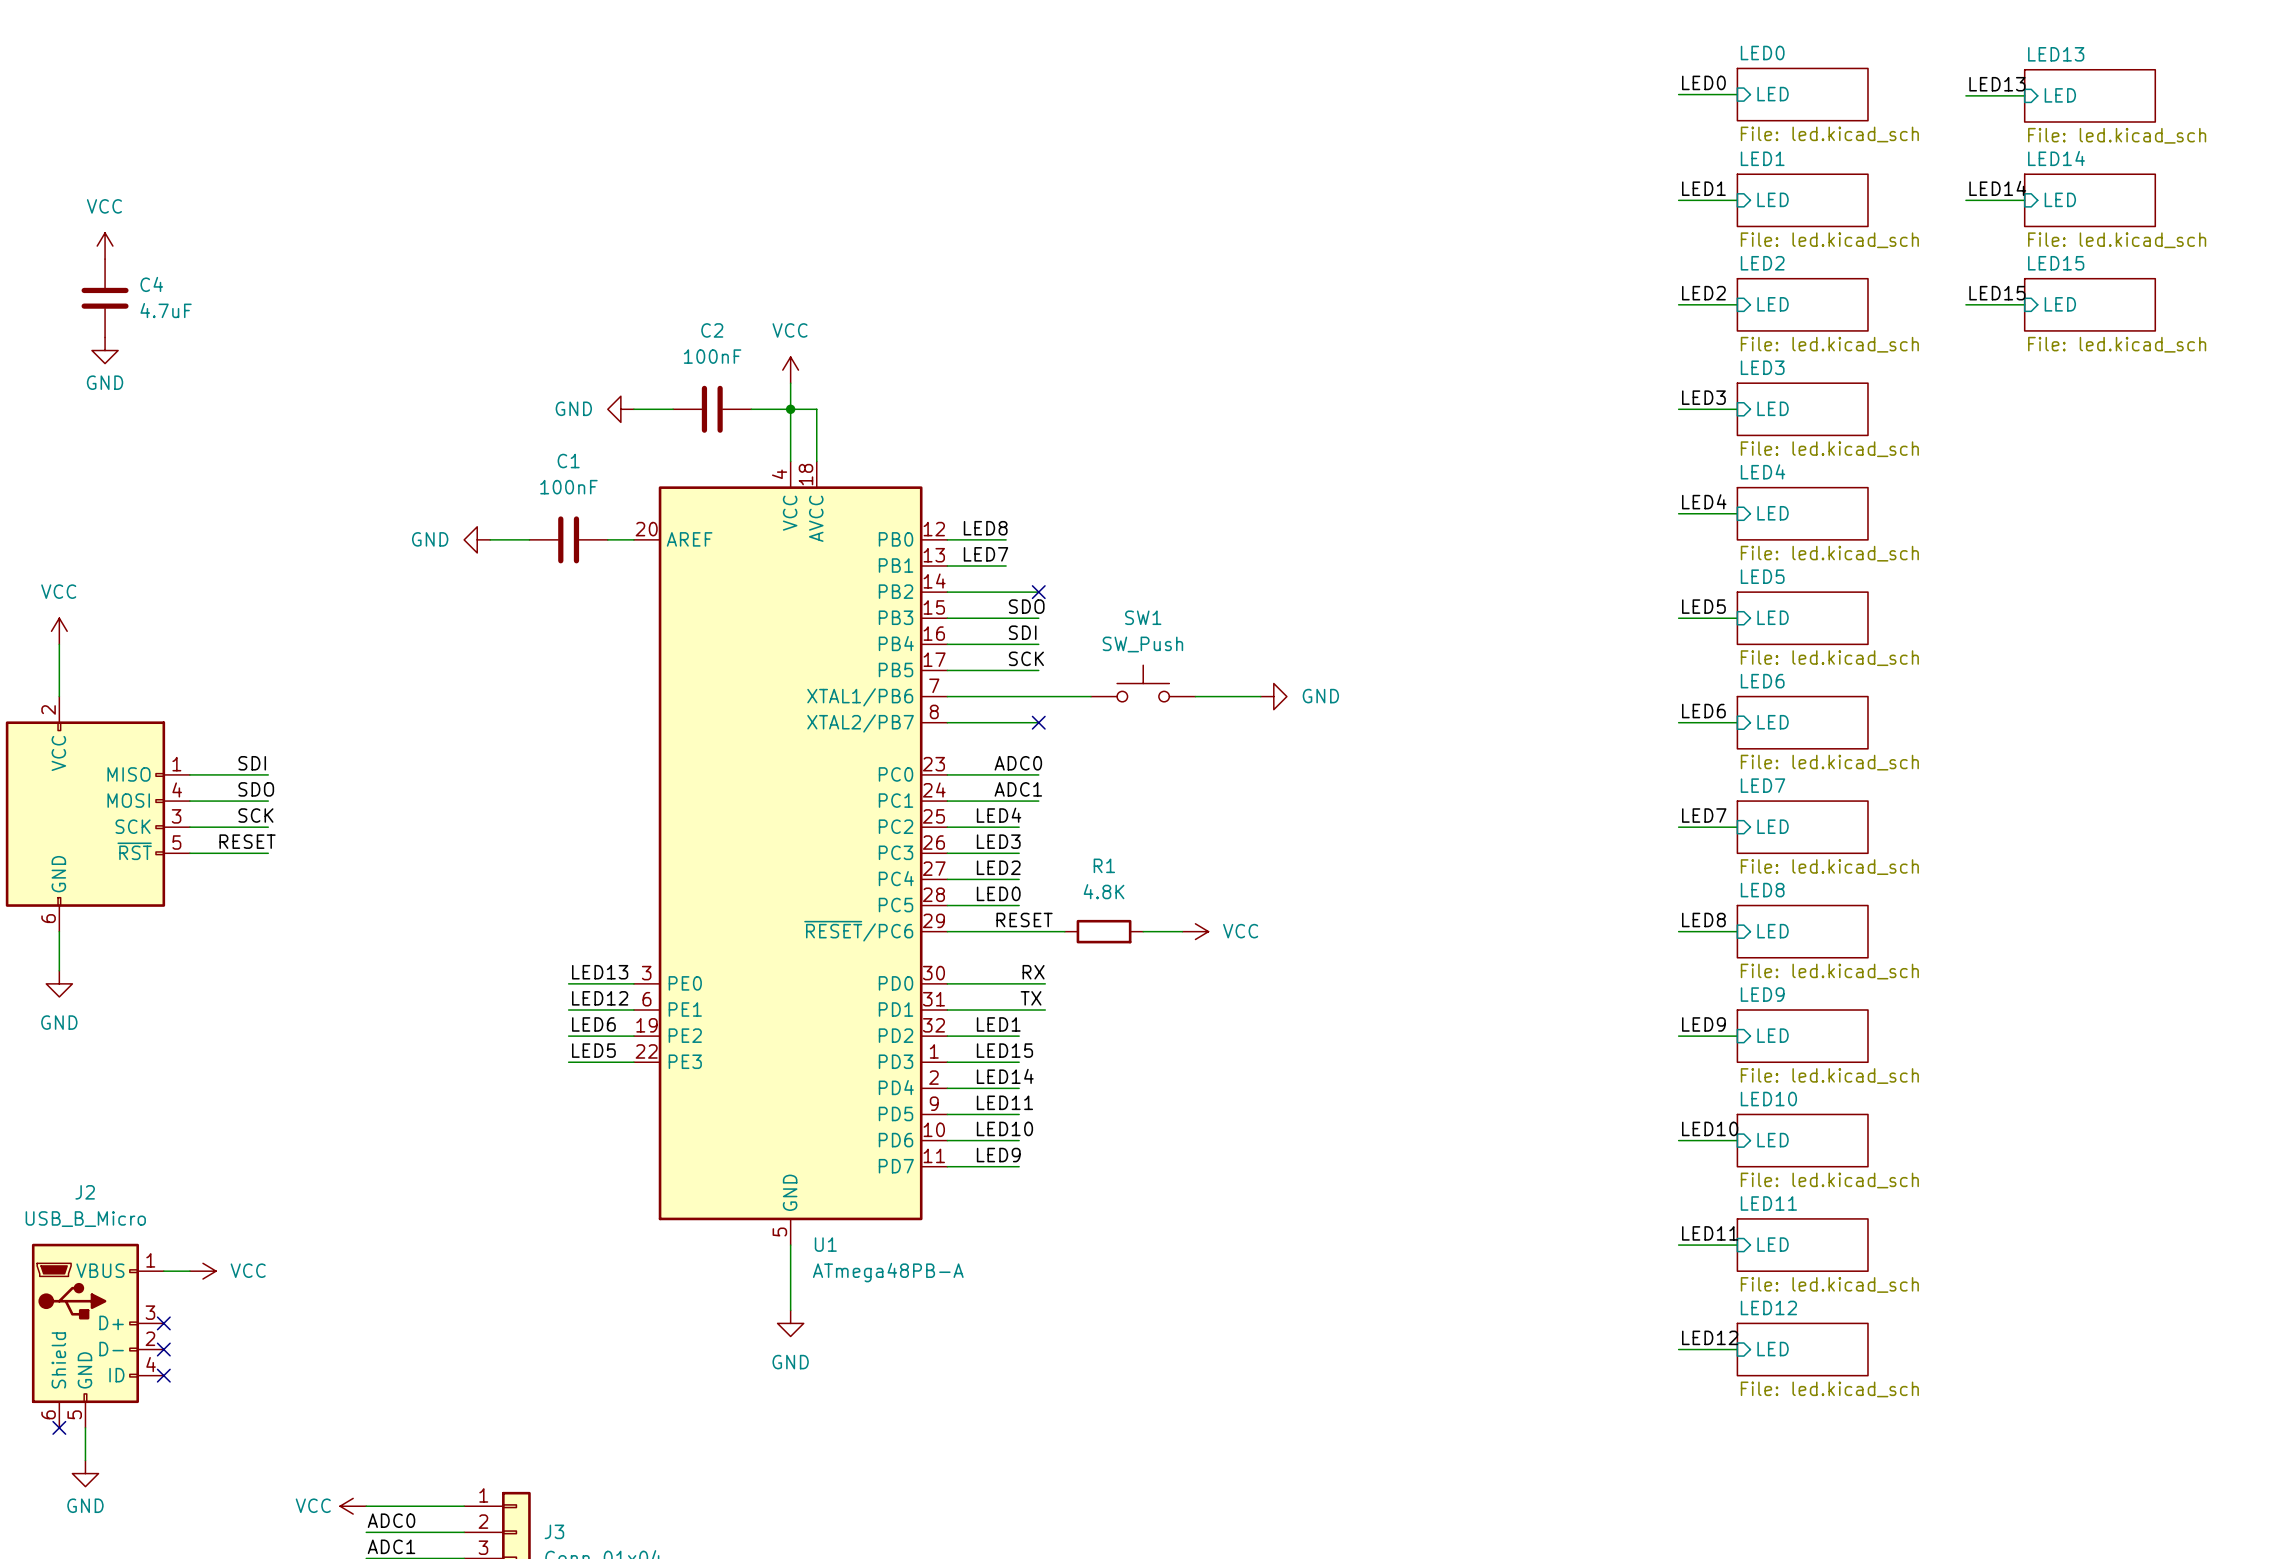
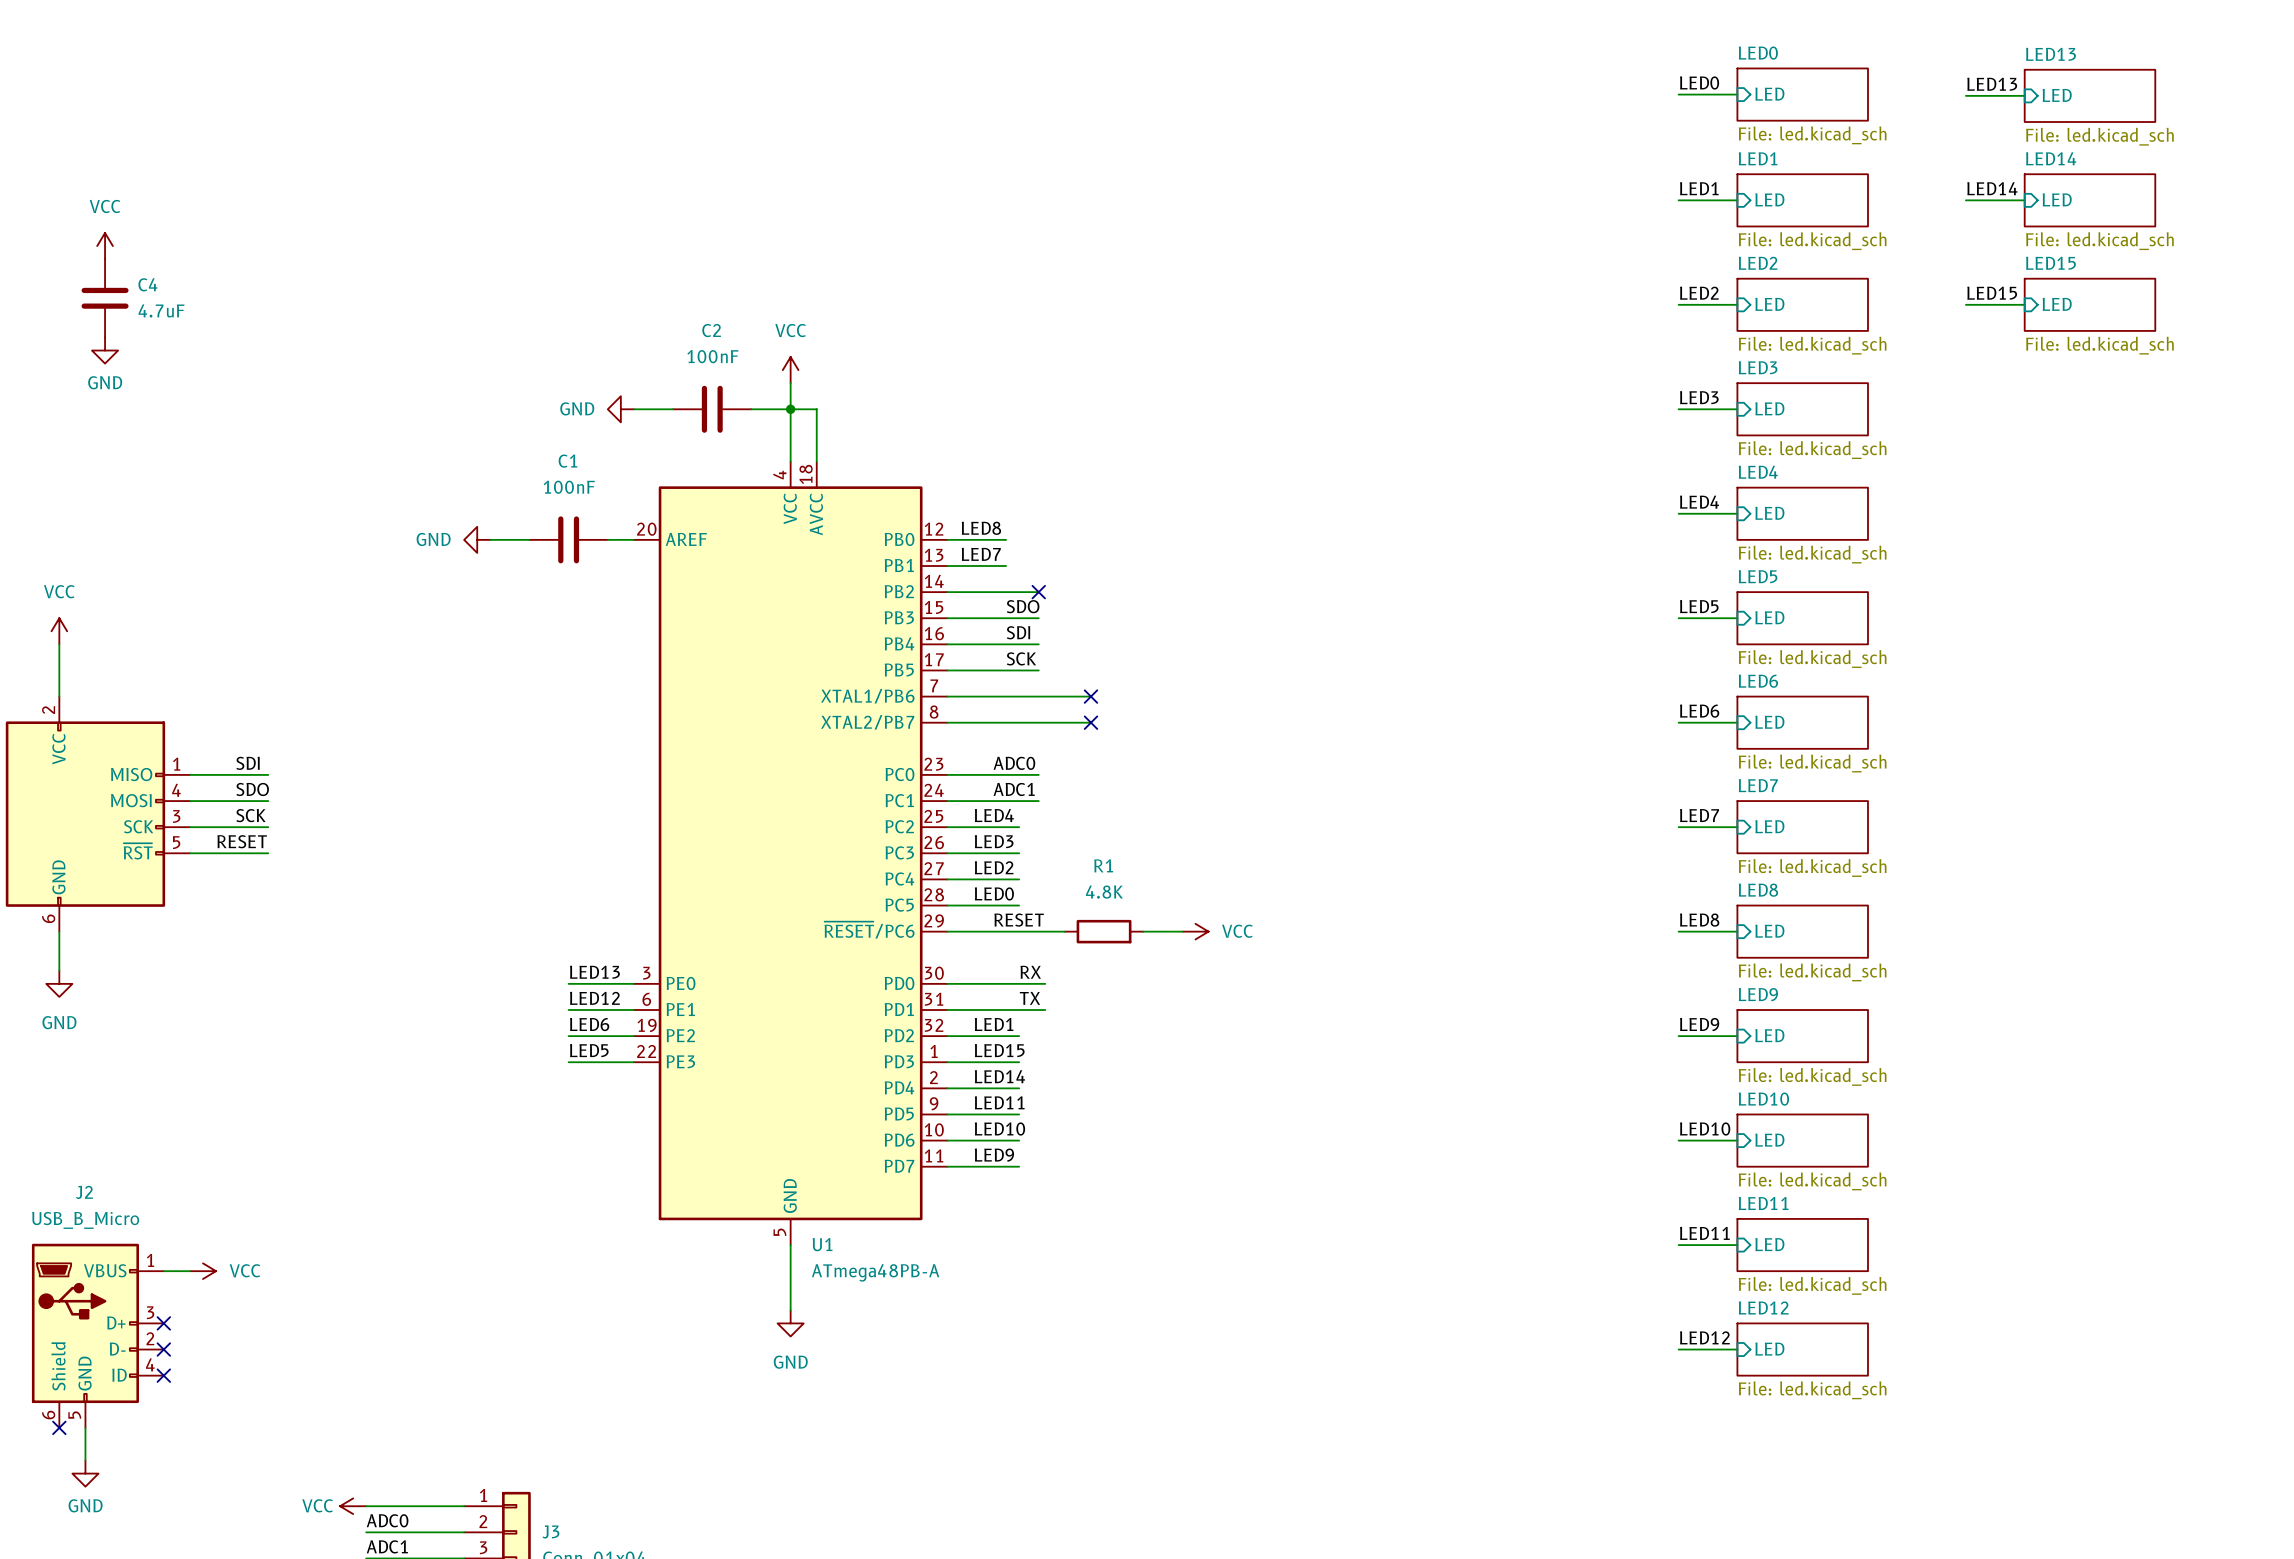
SW1: SW_Push (1143, 683) -> none
no-connect mark: none -> (1090, 696)
wire: (1195, 696) (1260, 696) -> none
power symbol: GND (1273, 696) -> none
wire: none -> (1038, 722) (1090, 722)
no-connect mark: (1038, 722) -> none
no-connect mark: none -> (1090, 722)

